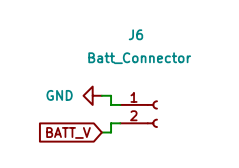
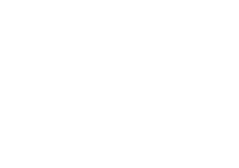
power symbol: GND (92, 95) -> none
wire: (101, 95) (111, 95) (111, 104) (120, 104) -> none
J6: Batt_Connector (138, 114) -> none
wire: (120, 123) (111, 123) (111, 132) (101, 132) -> none
global label: BATT_V (68, 132) -> none

